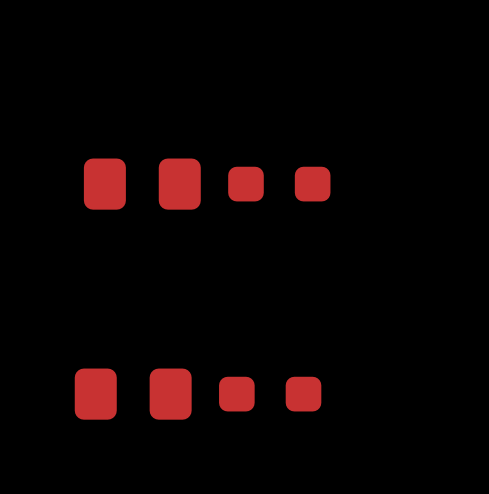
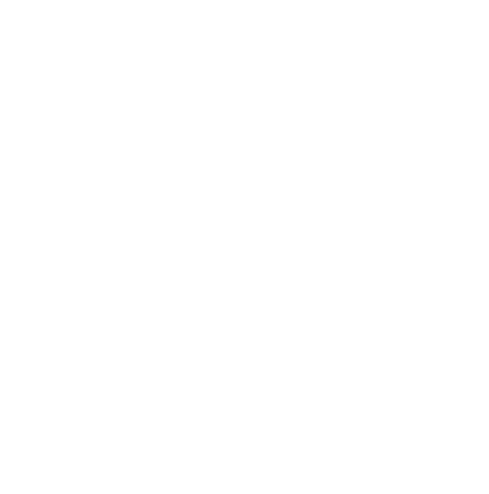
part: (142, 184) -> none
part: (279, 184) -> none
part: (133, 394) -> none
part: (270, 394) -> none

